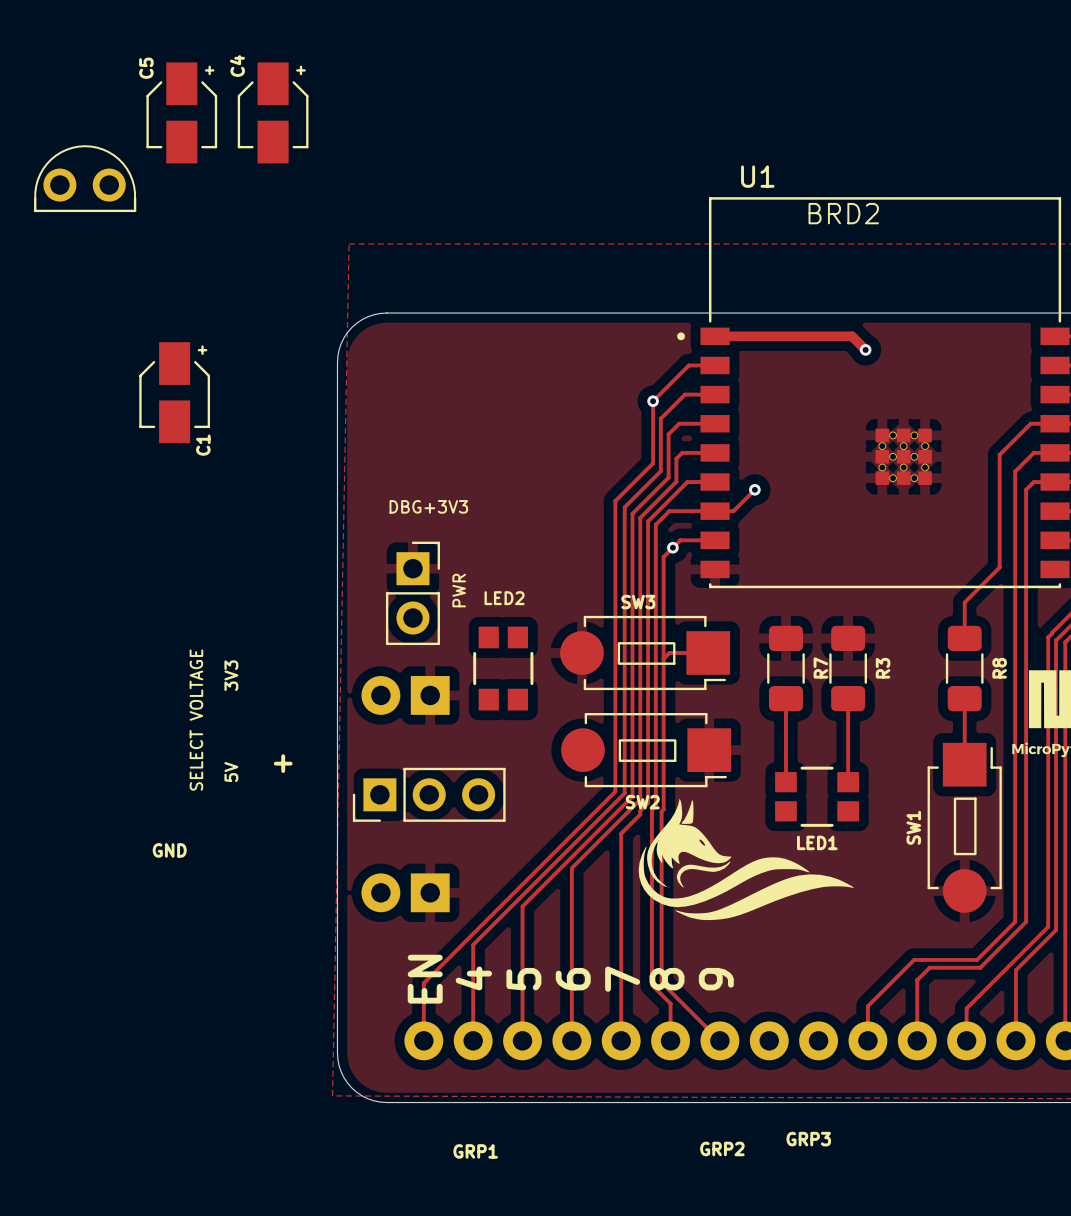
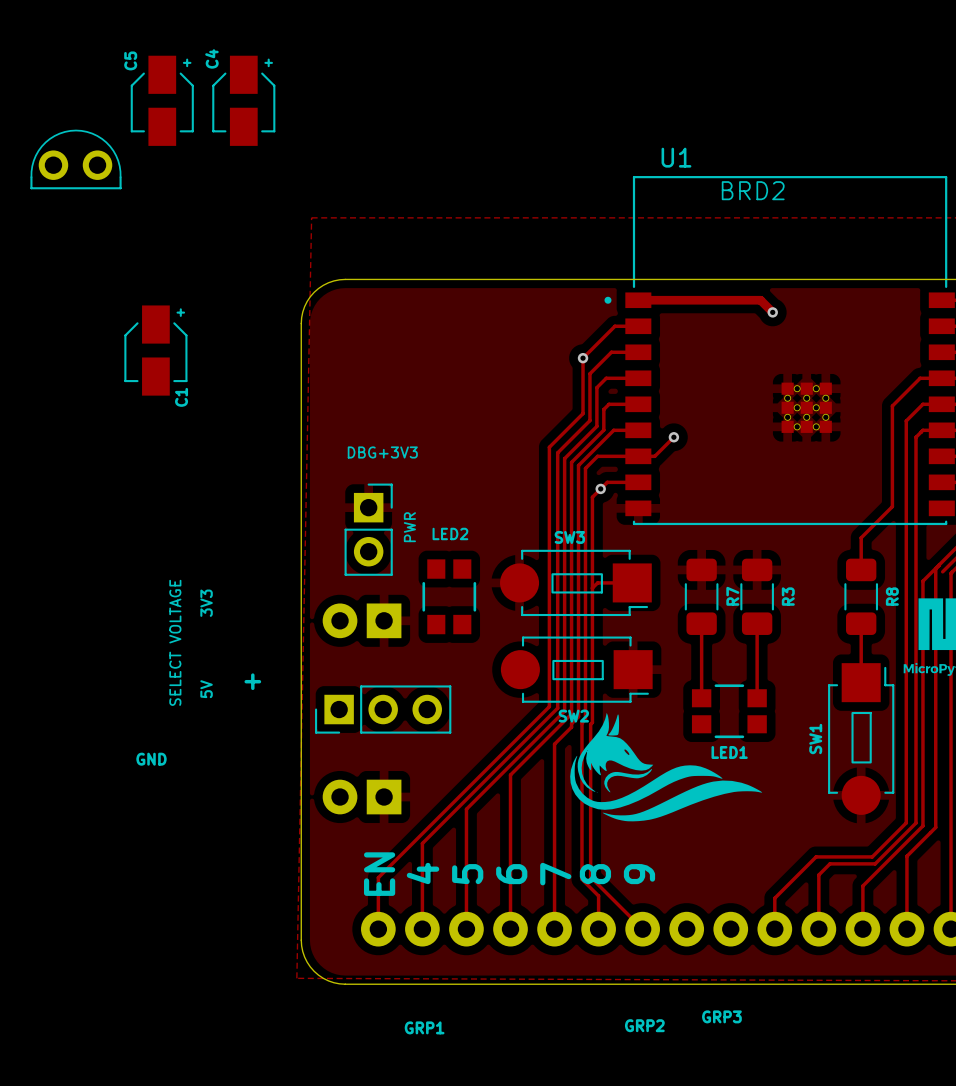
track: none -> (939, 564) (922, 581) (922, 825) (862, 885) (862, 900)
track: (1056, 640) (1056, 930) (1015, 970) -> none
track: (1015, 959) (966, 1008) -> (906, 856) (906, 866)

